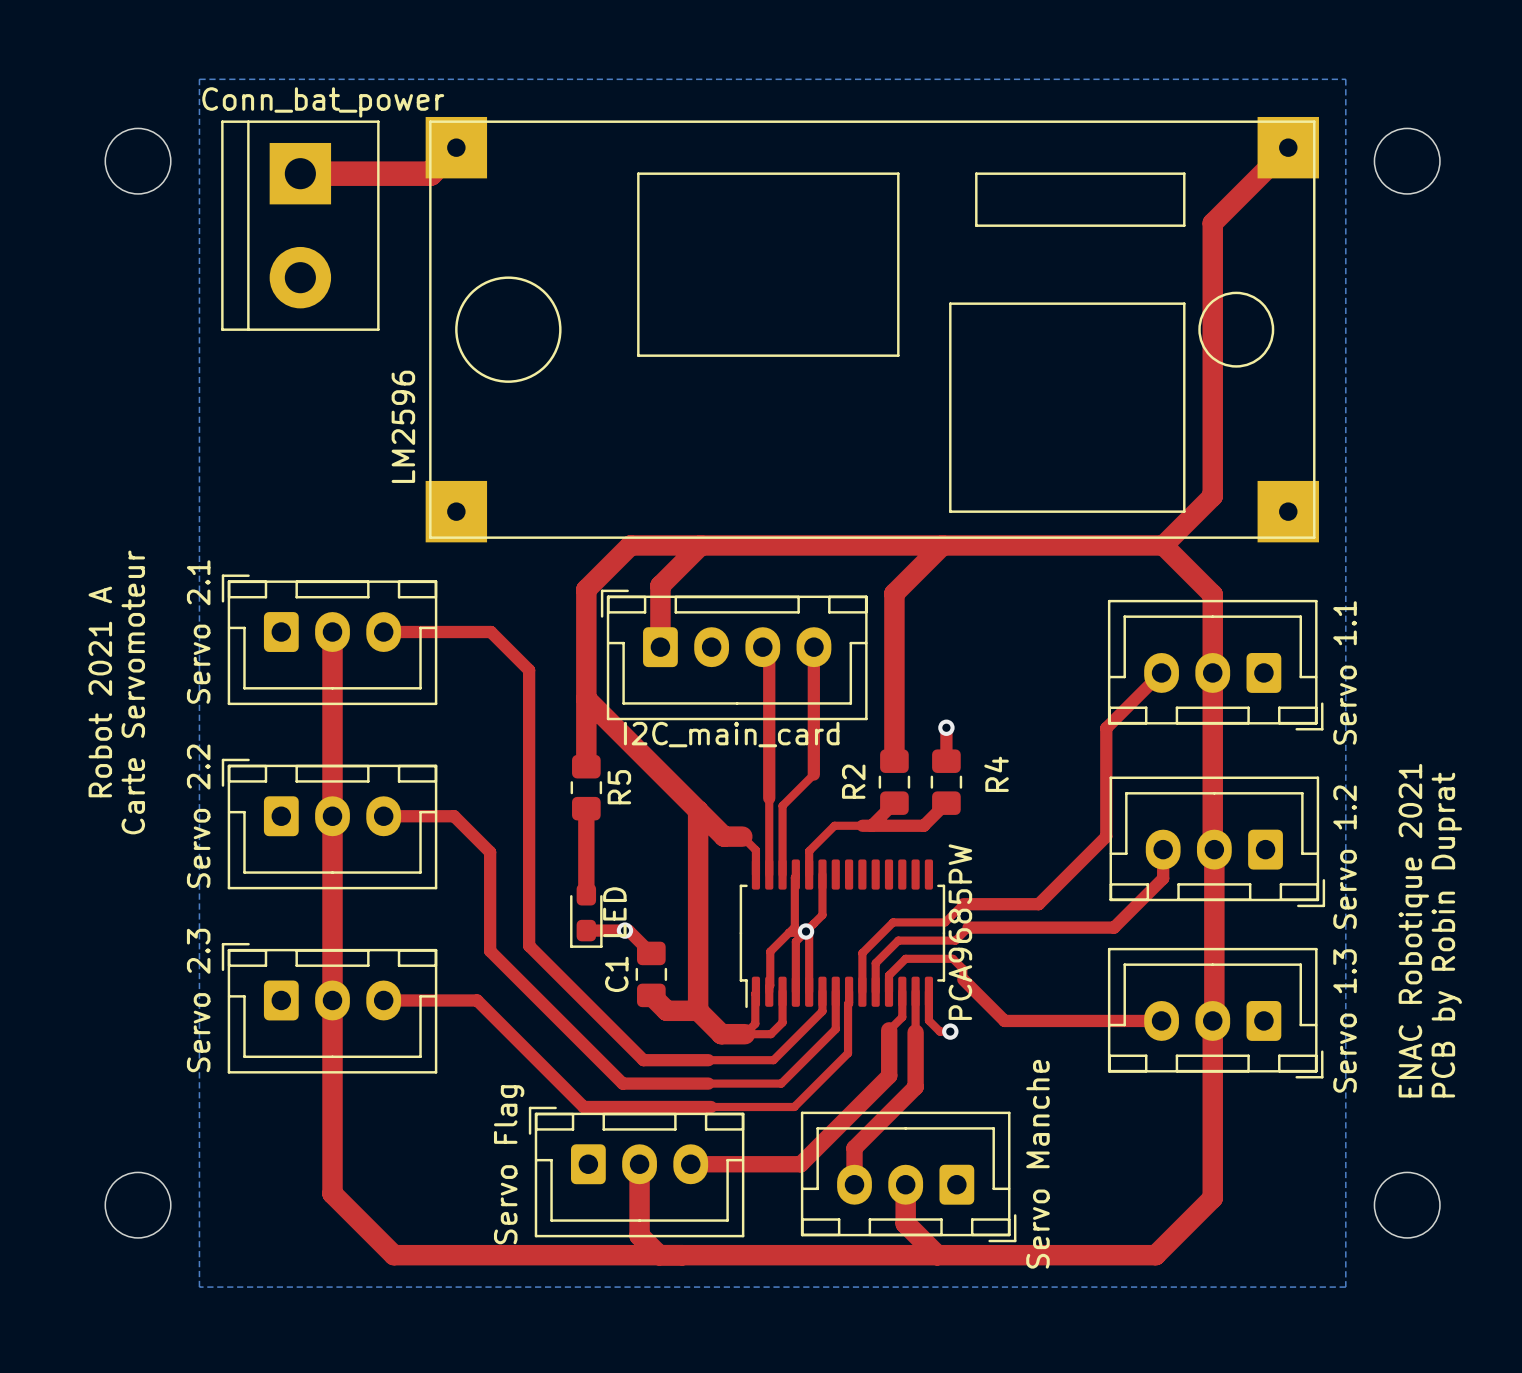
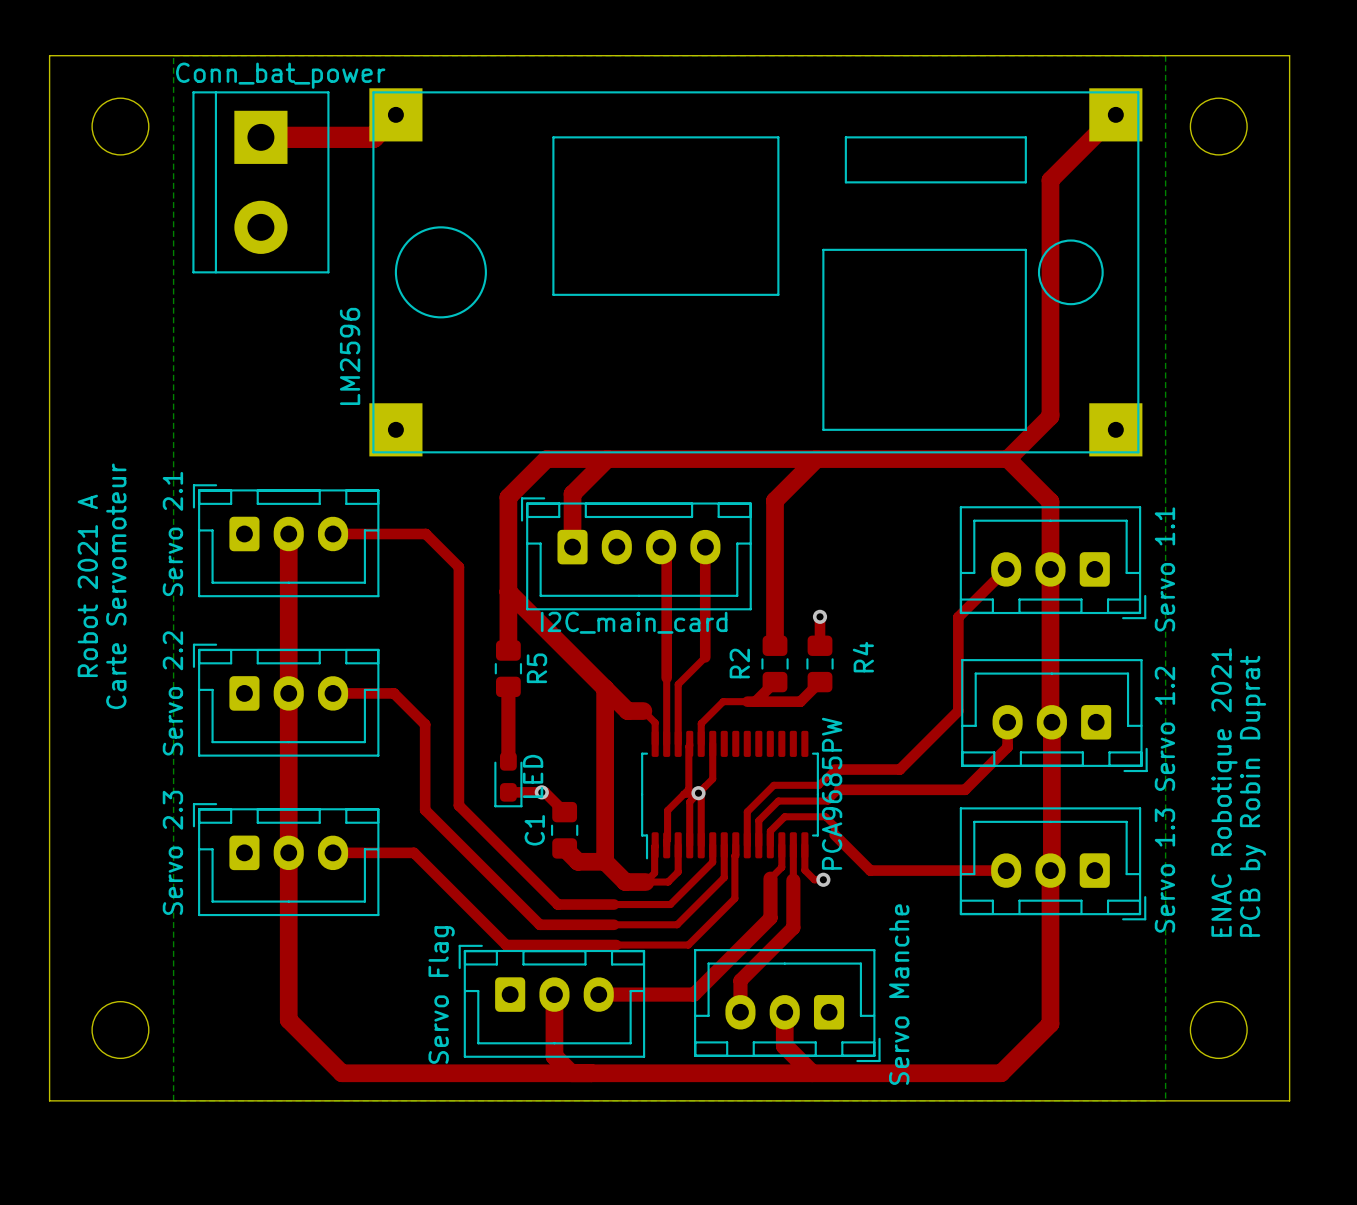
board edge: none -> (49, 55) (49, 1100) (1289, 1100) (1289, 55) (49, 55)

